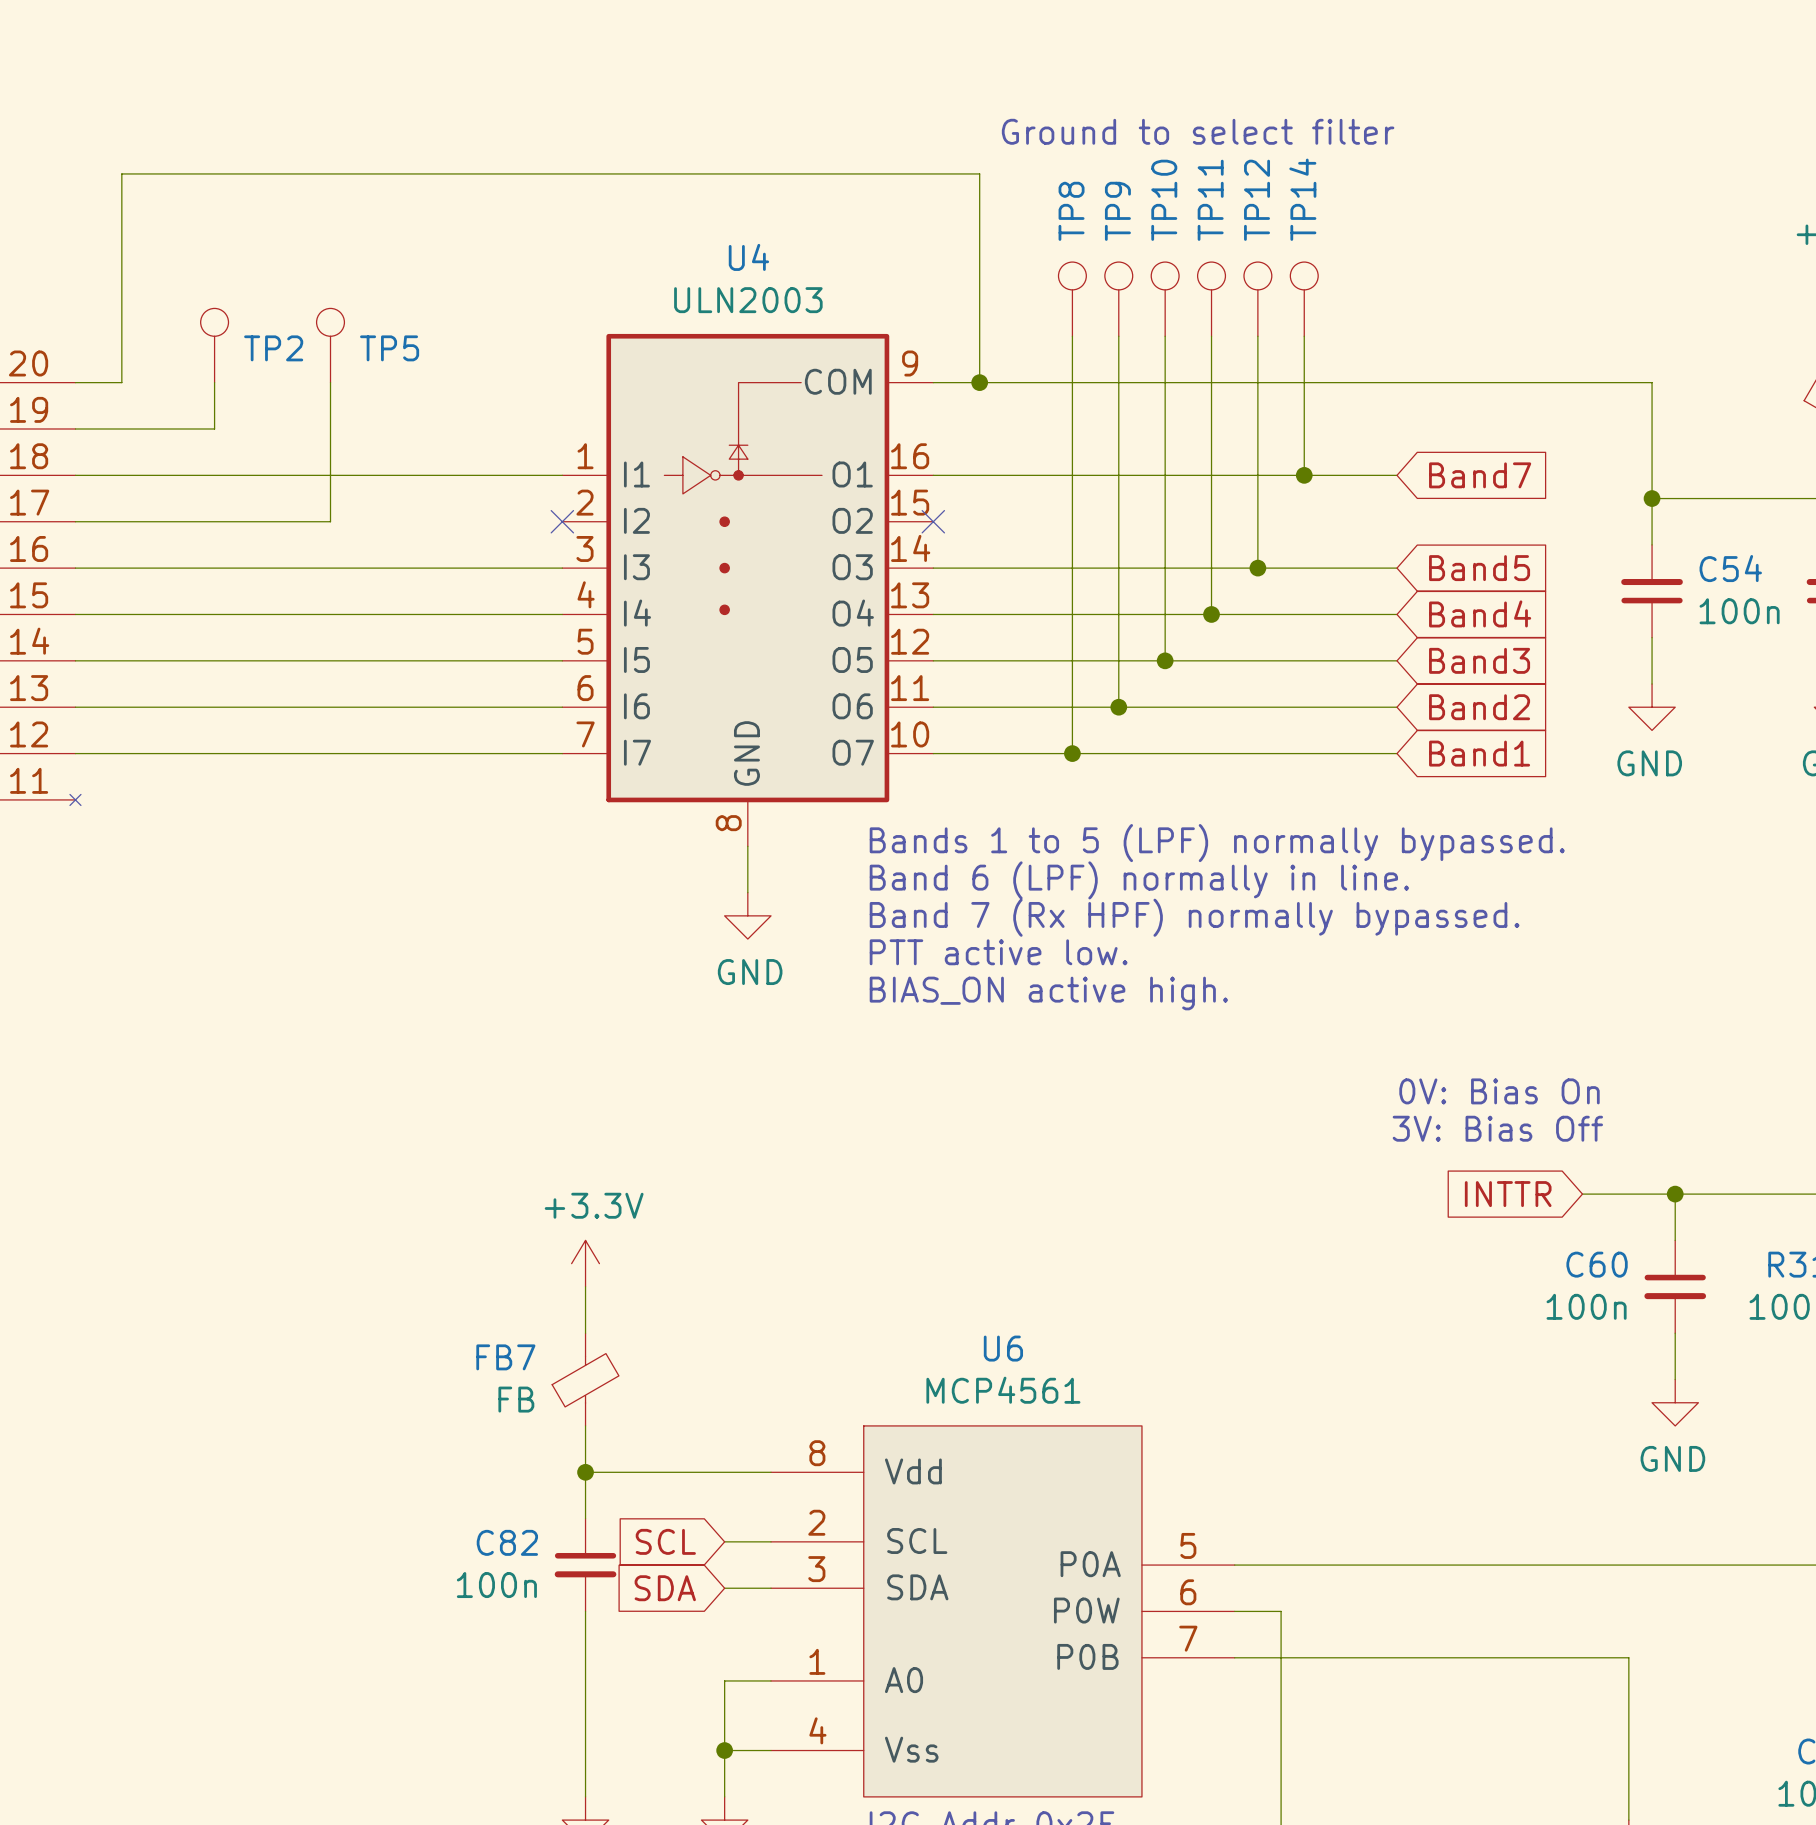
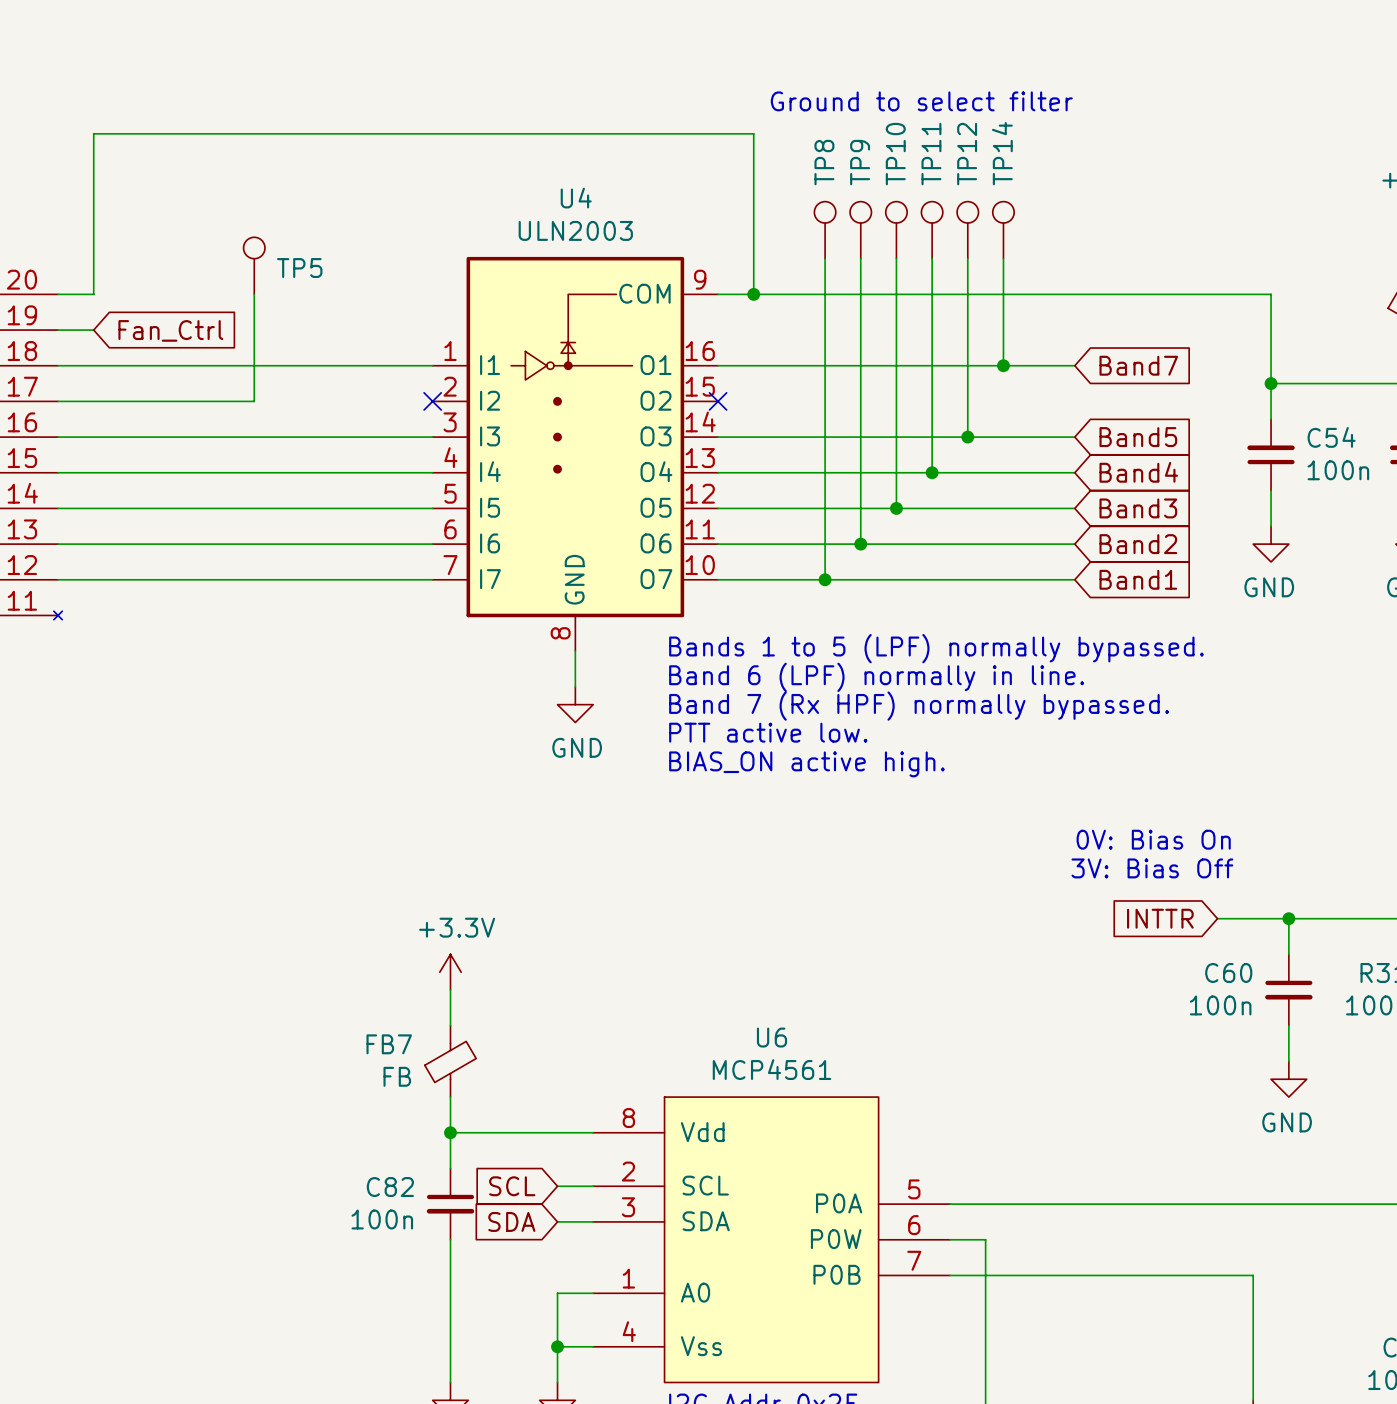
TP2: (214, 345) -> none
wire: (214, 382) (214, 428) (121, 428) -> none
global label: none -> Fan_Ctrl (170, 330)

